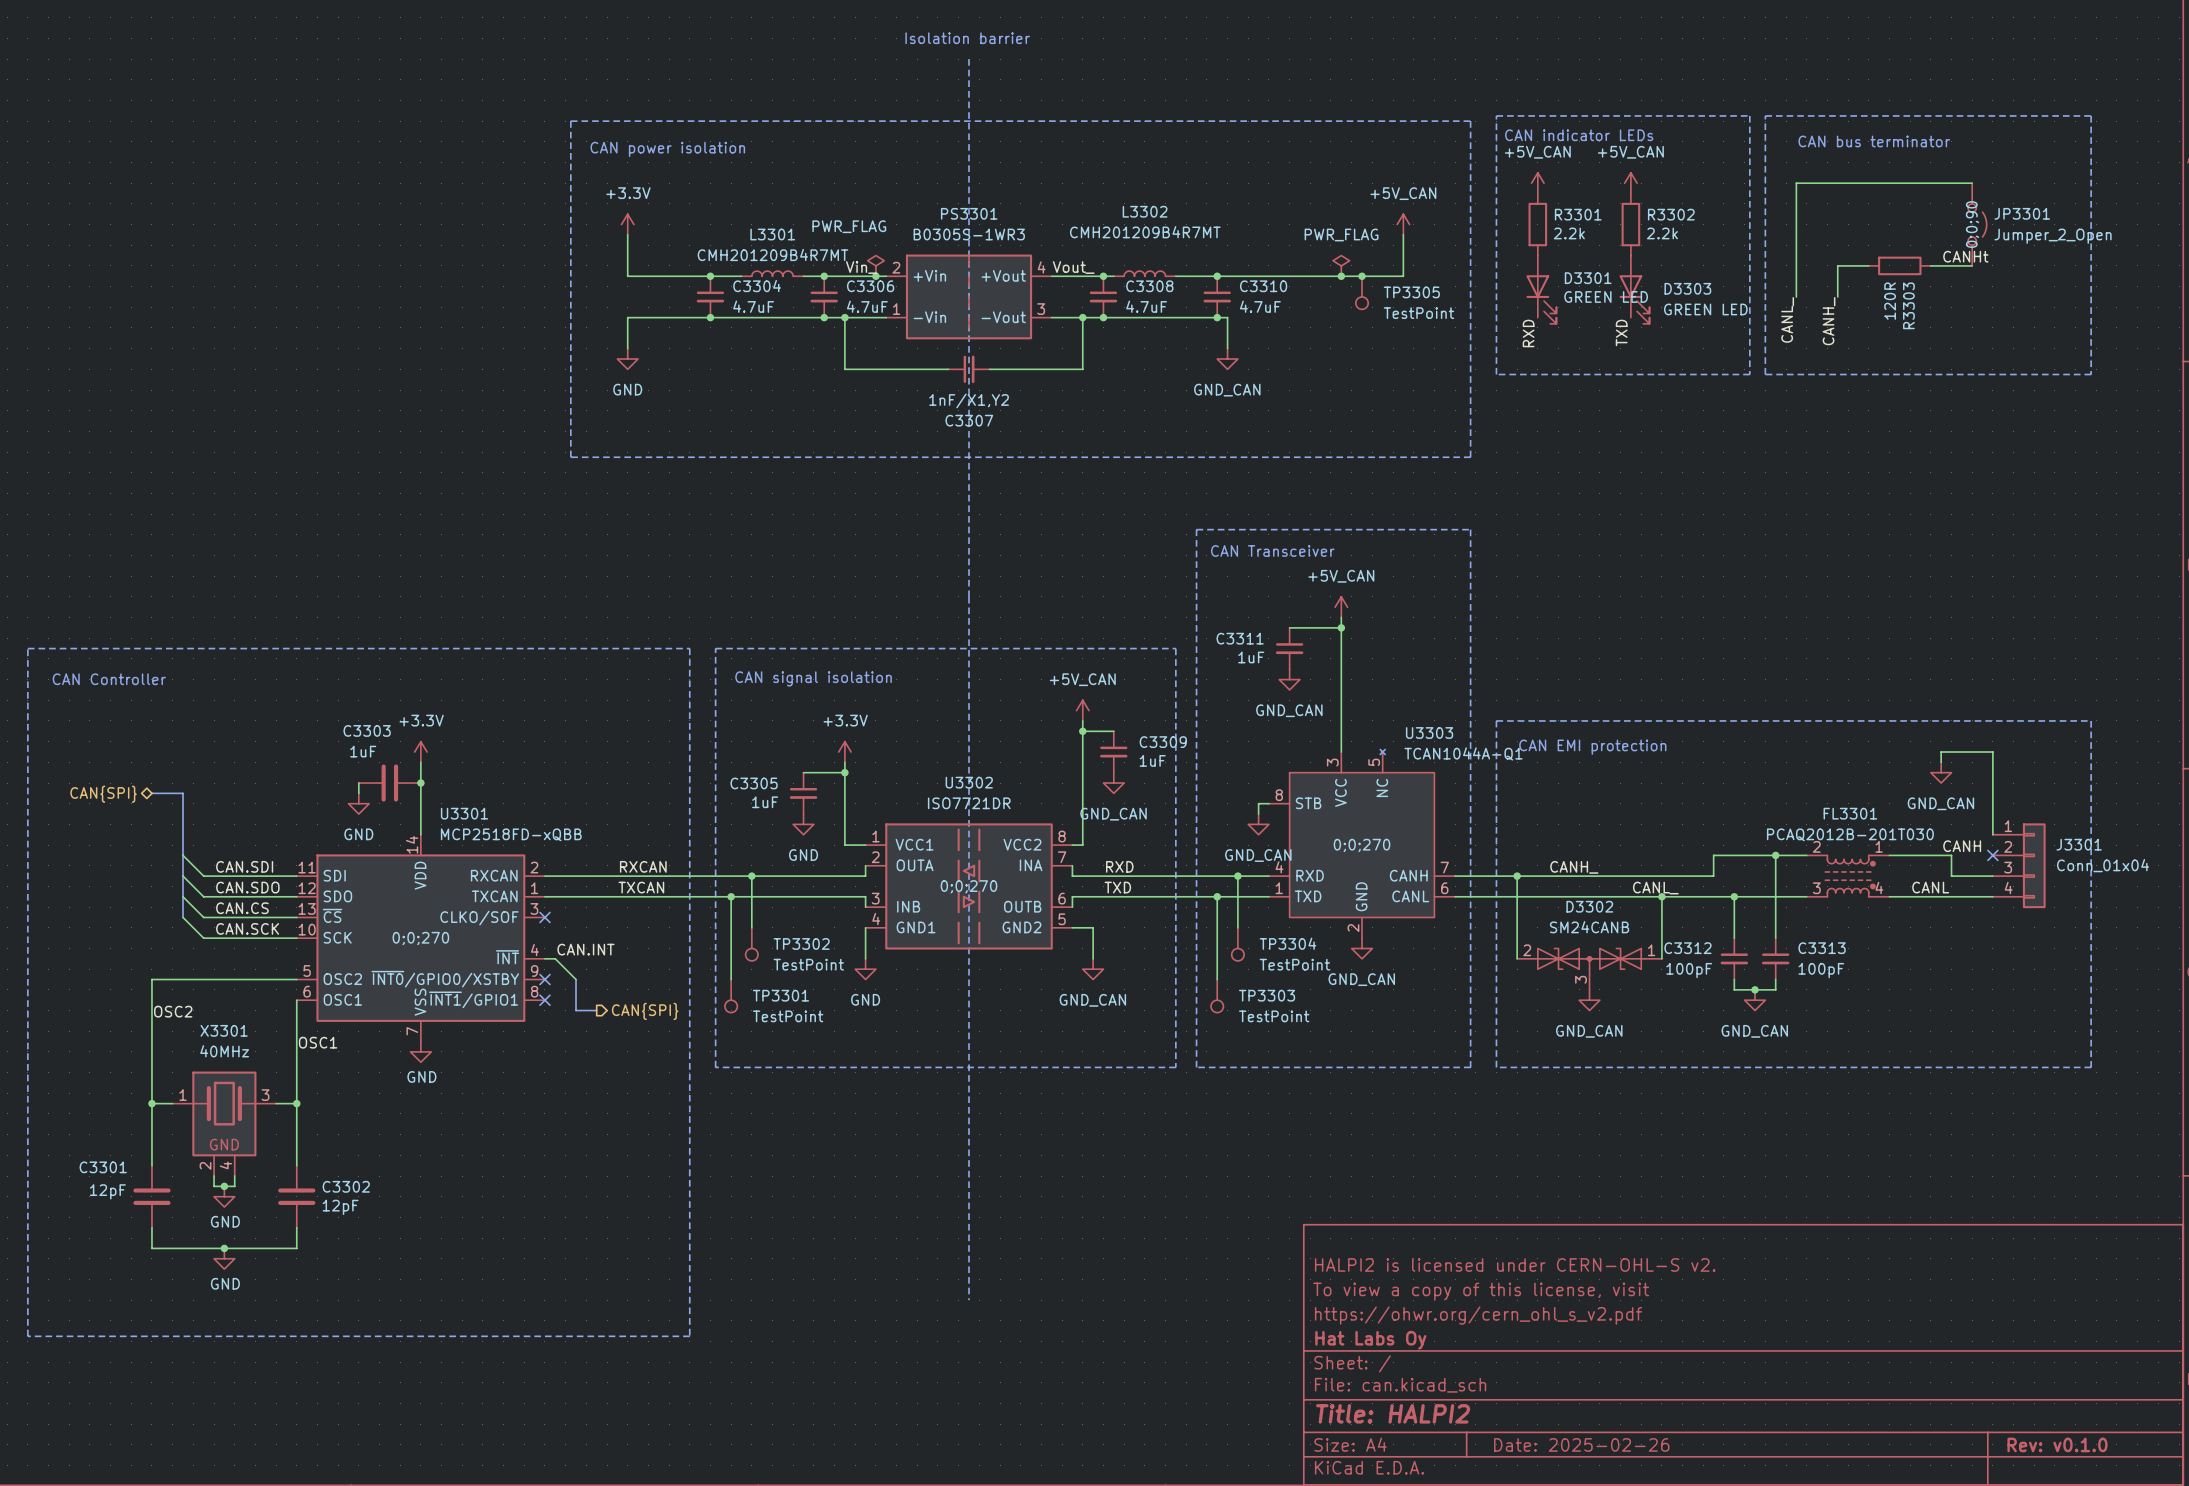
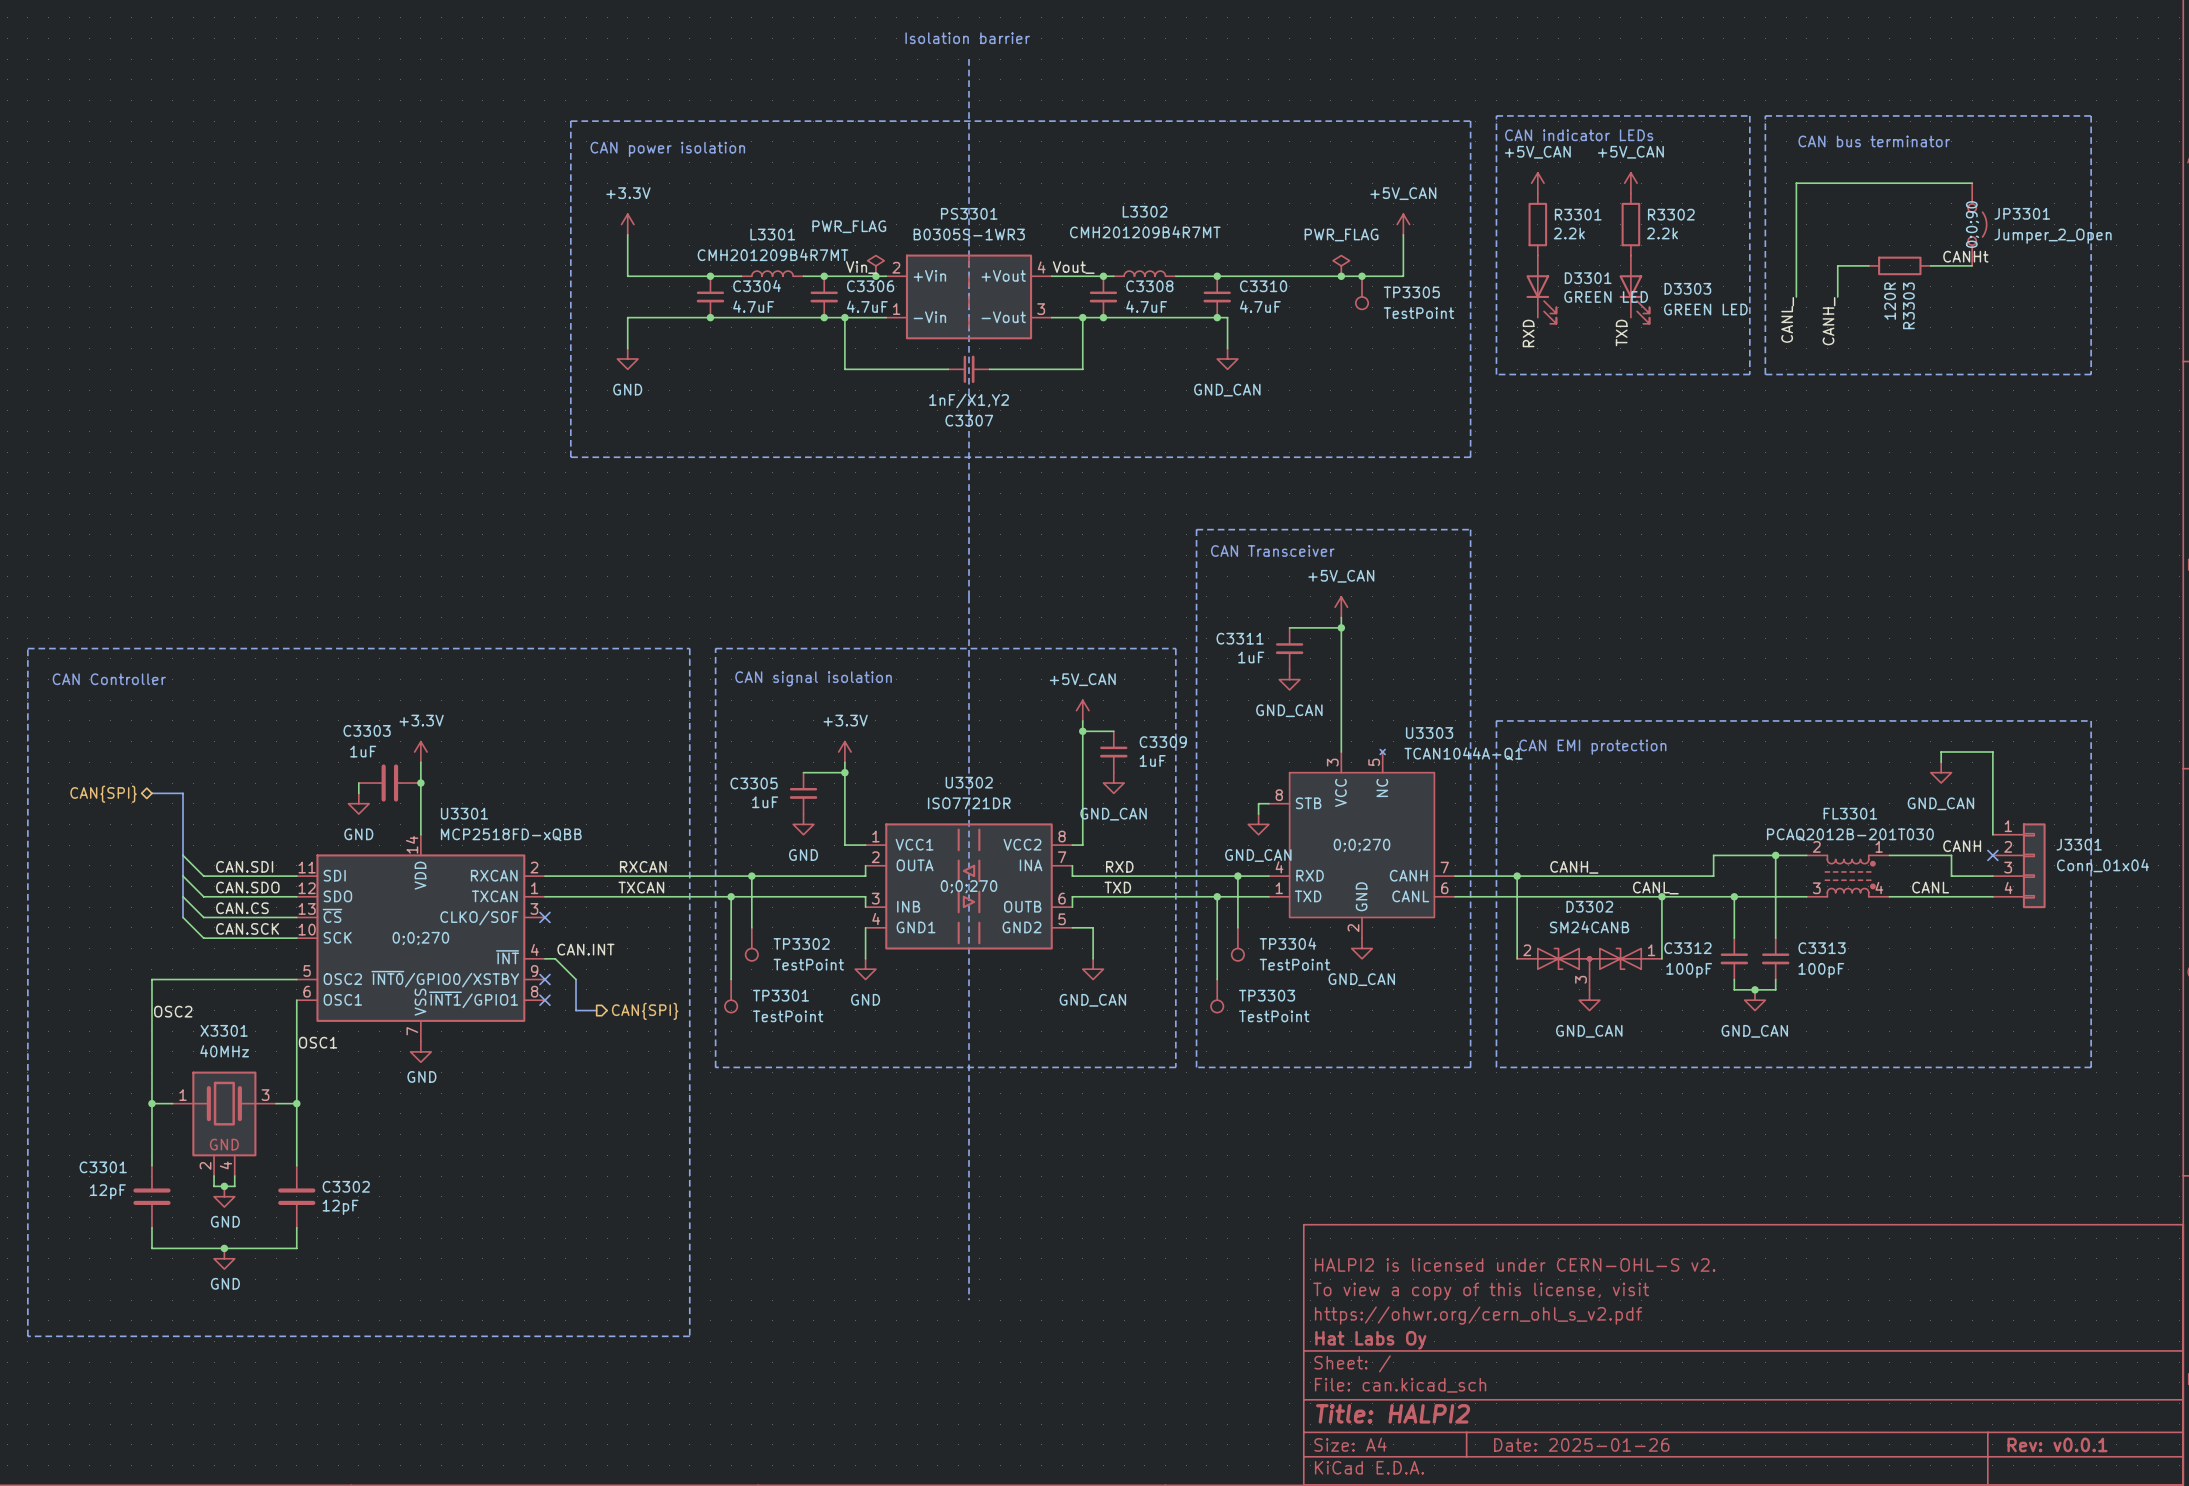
title block: Date: 2025-02-26 (1581, 1444) -> Date: 2025-01-26 (1581, 1444)
title block: Rev: v0.1.0 (2057, 1444) -> Rev: v0.0.1 (2057, 1444)

